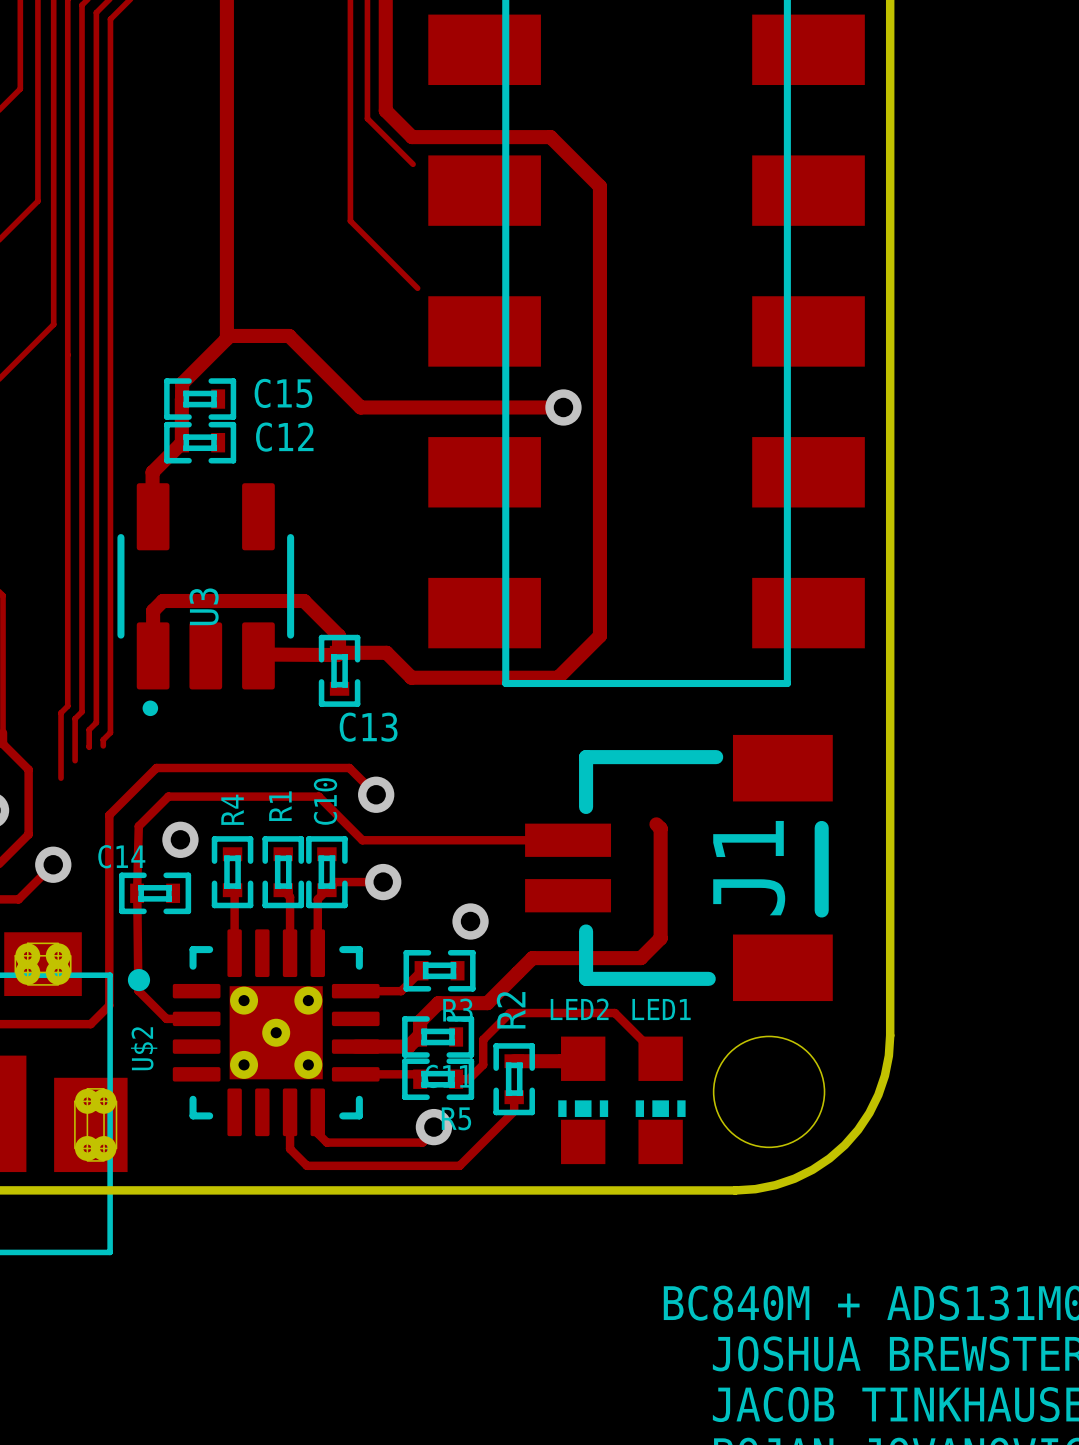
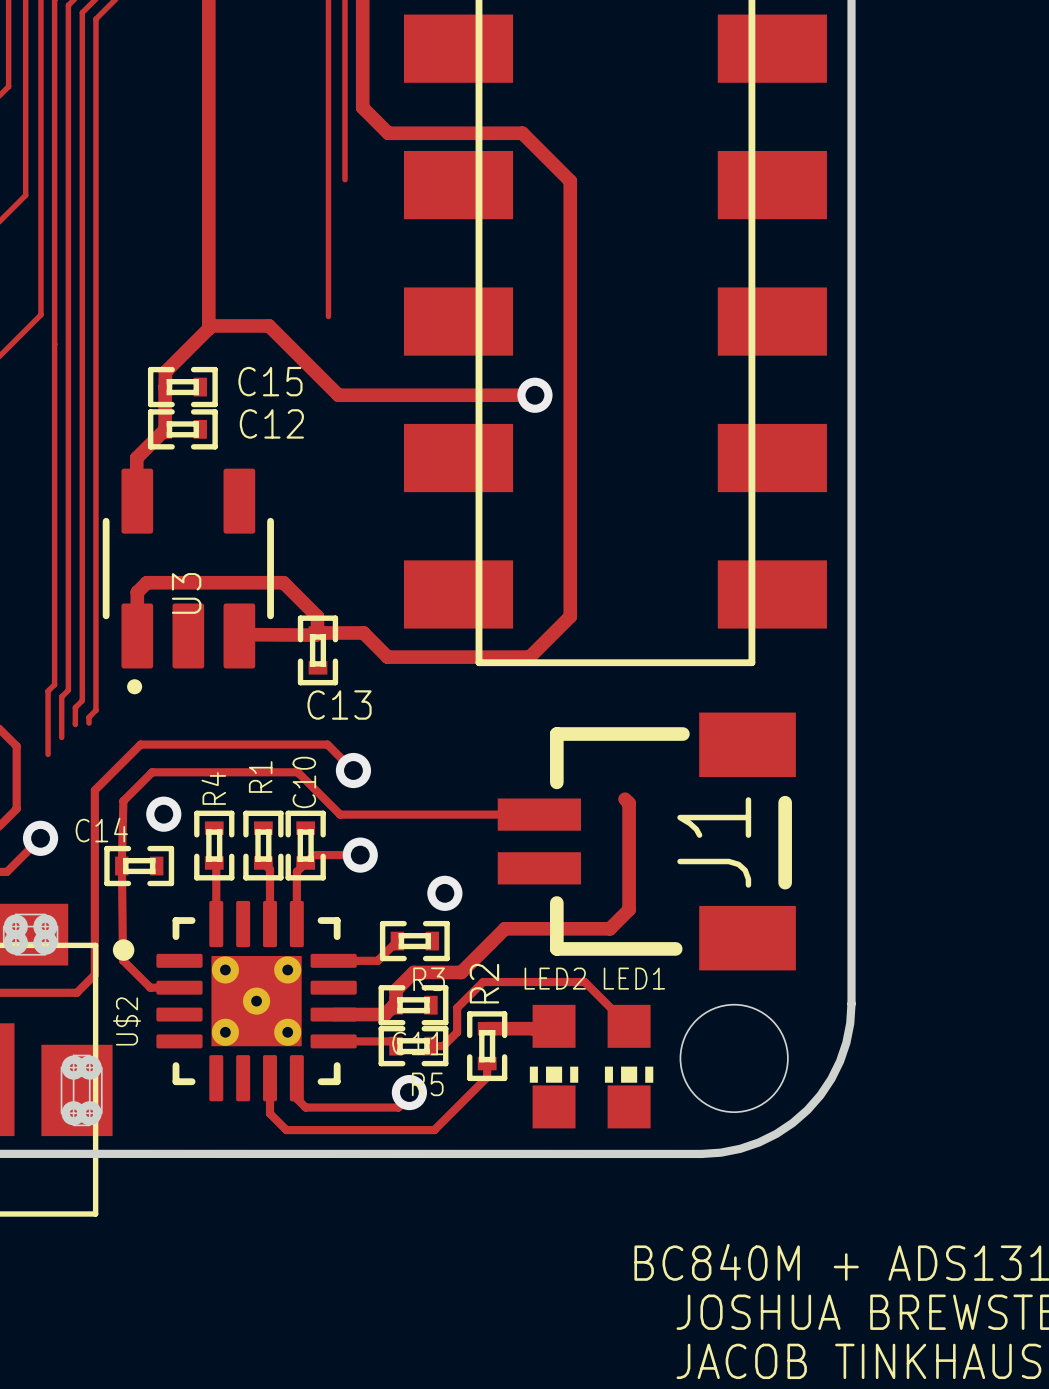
track: (367, 118) (413, 164) -> (344, 115) (344, 179)
track: (350, 221) (417, 288) -> (328, 214) (328, 316)

